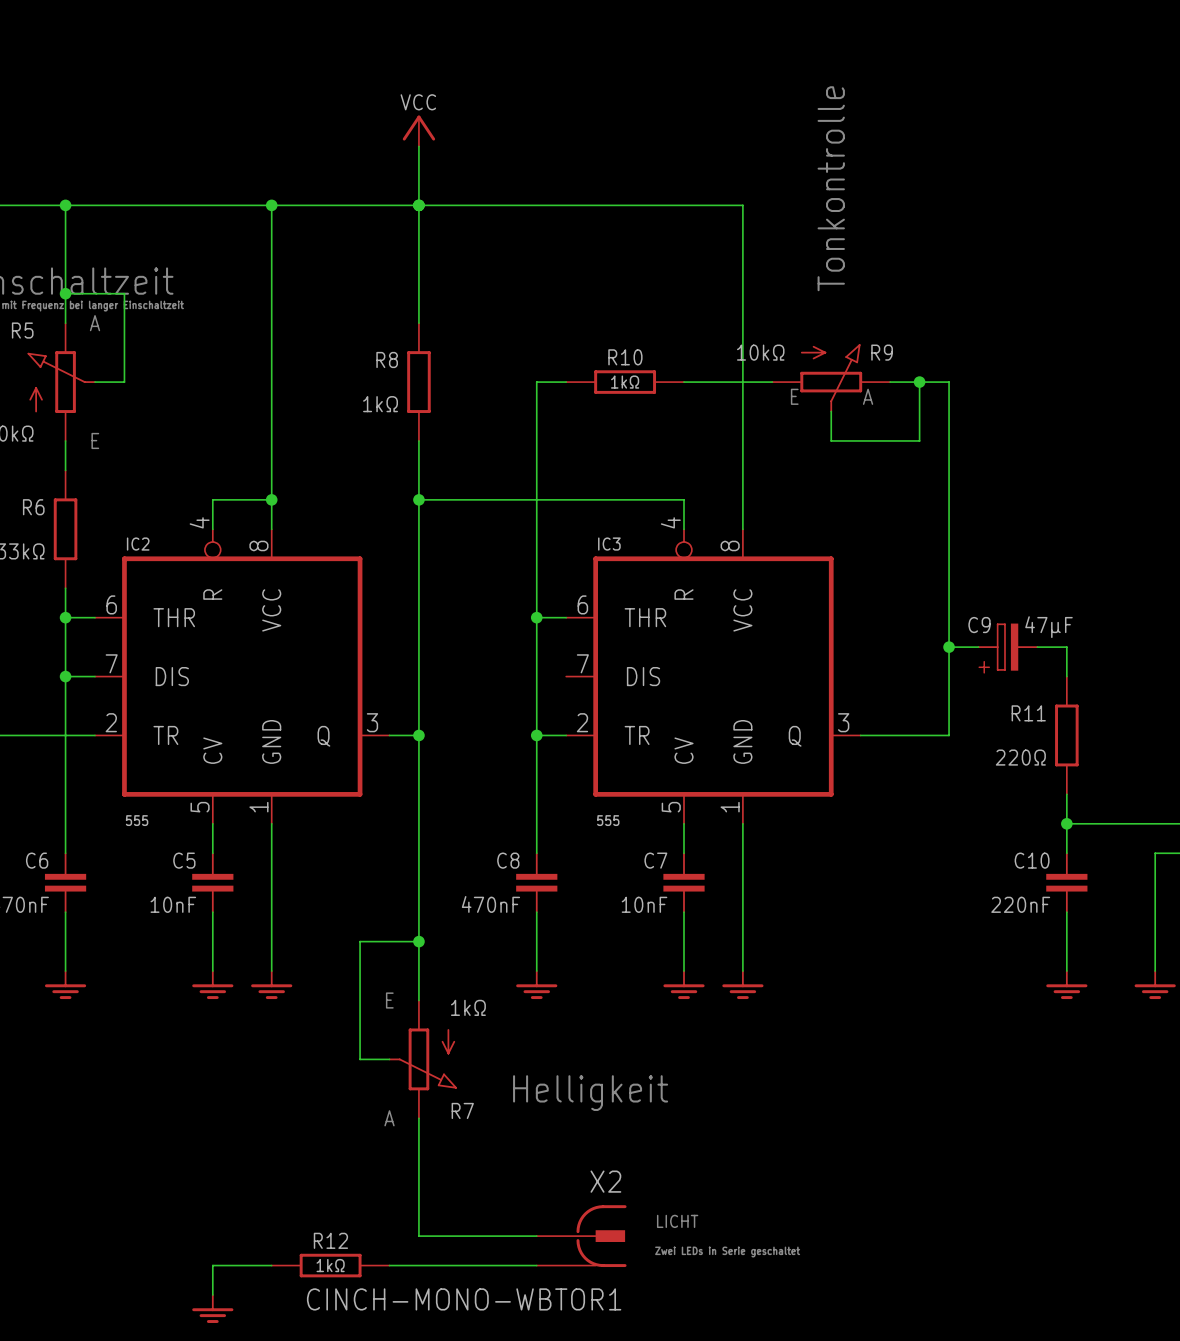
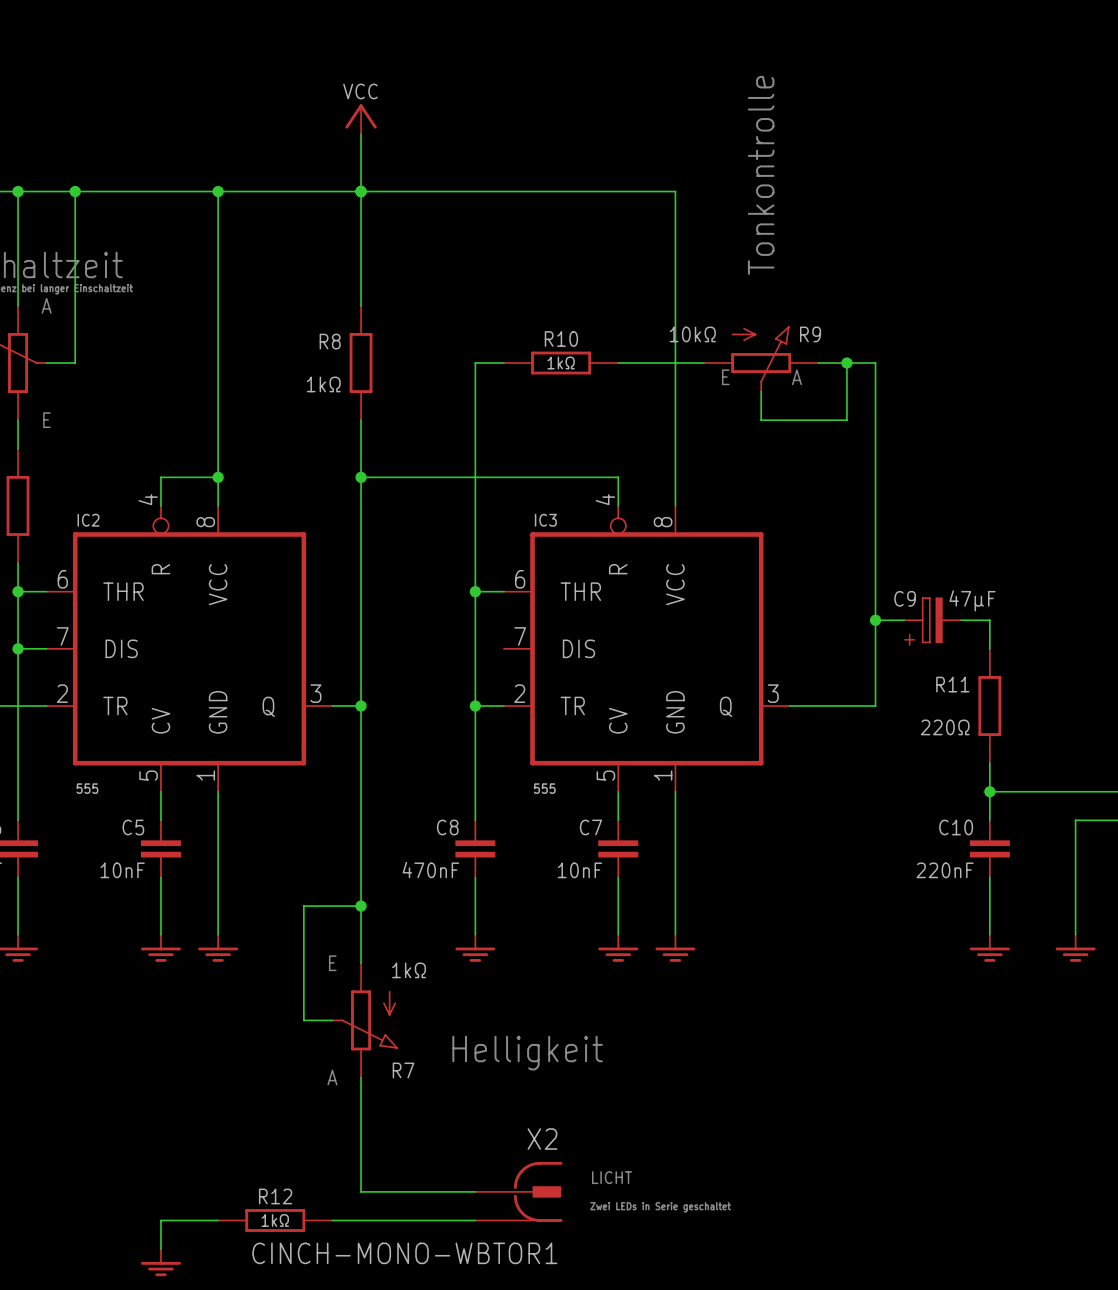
junction: none -> (75, 191)
wire: (65, 293) (124, 293) -> (75, 191) (75, 277)
junction: (65, 293) -> none

